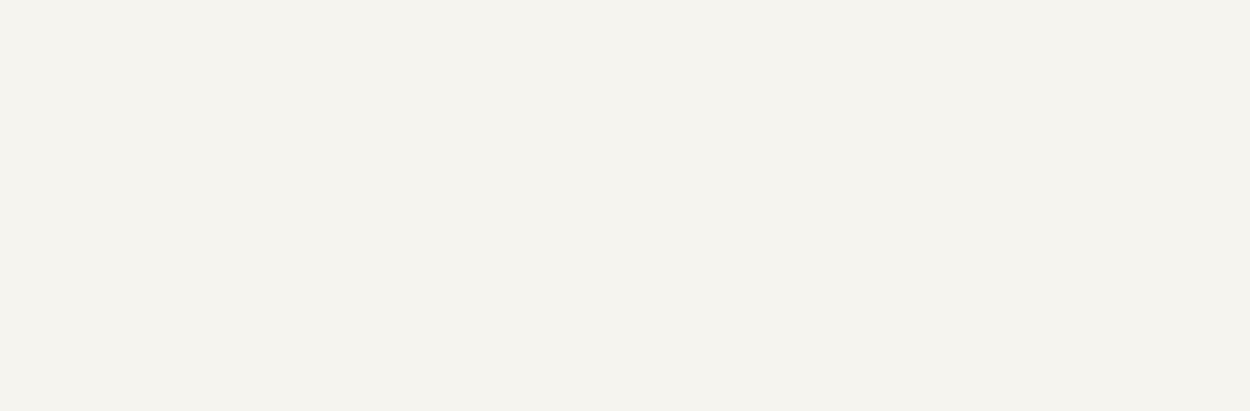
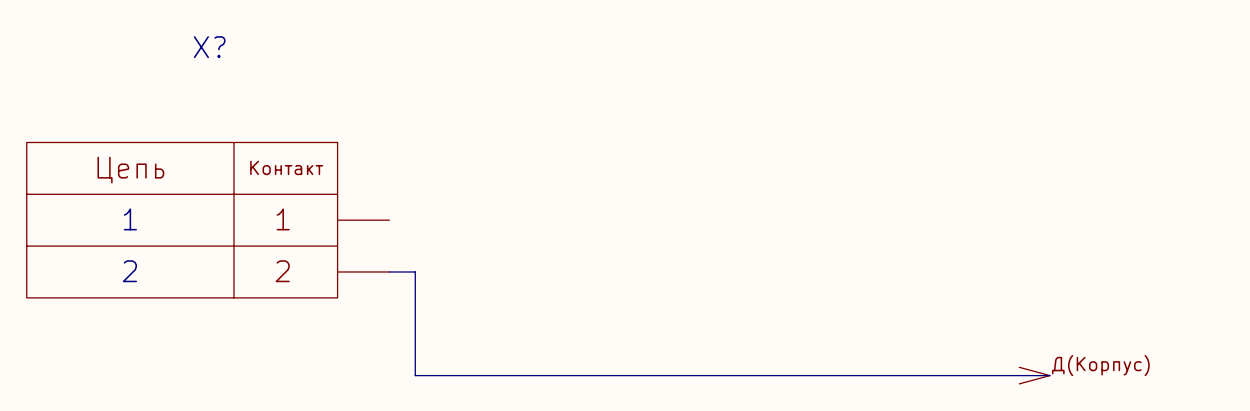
X?: none -> (208, 220)
wire: none -> (389, 271) (415, 271) (415, 375) (1049, 375)
label: none -> Д(Корпус) (1100, 365)
power symbol: none -> (1034, 375)

